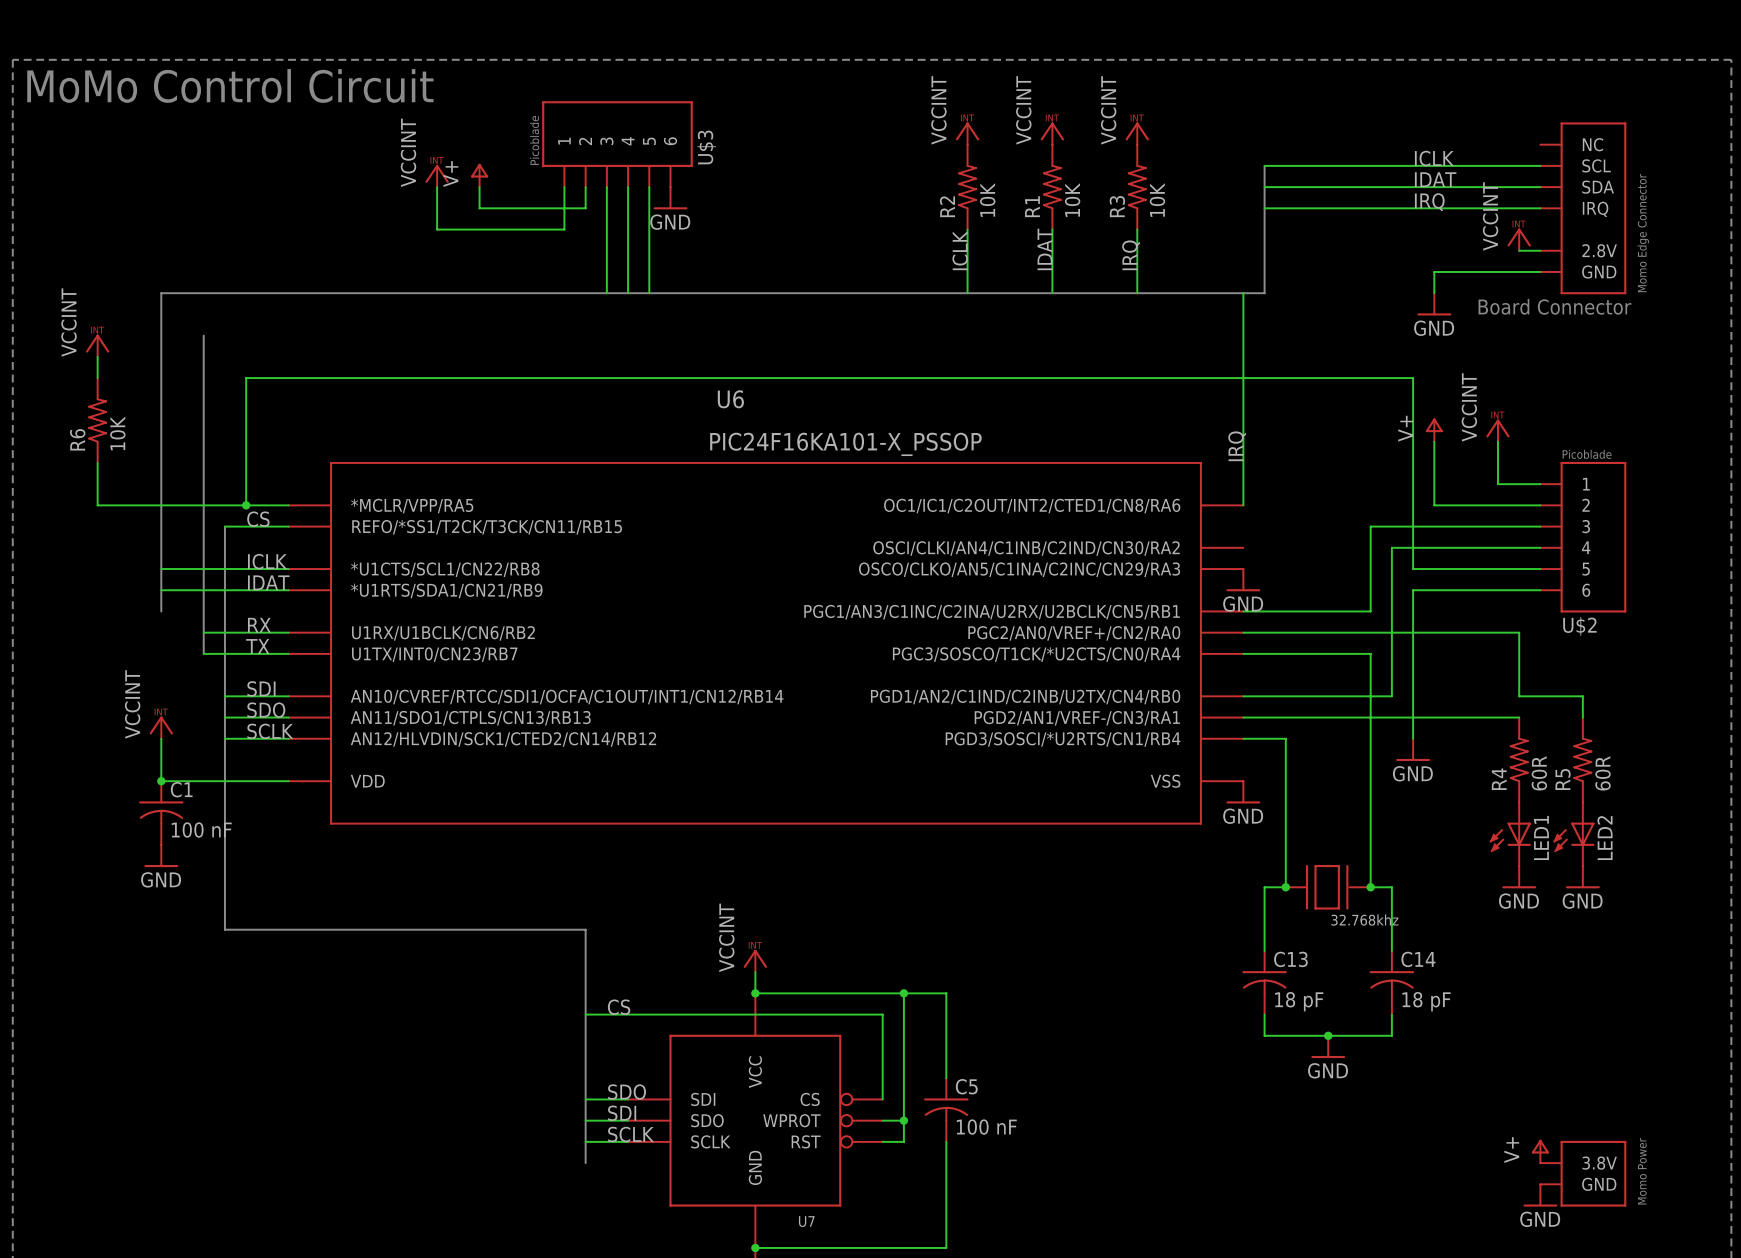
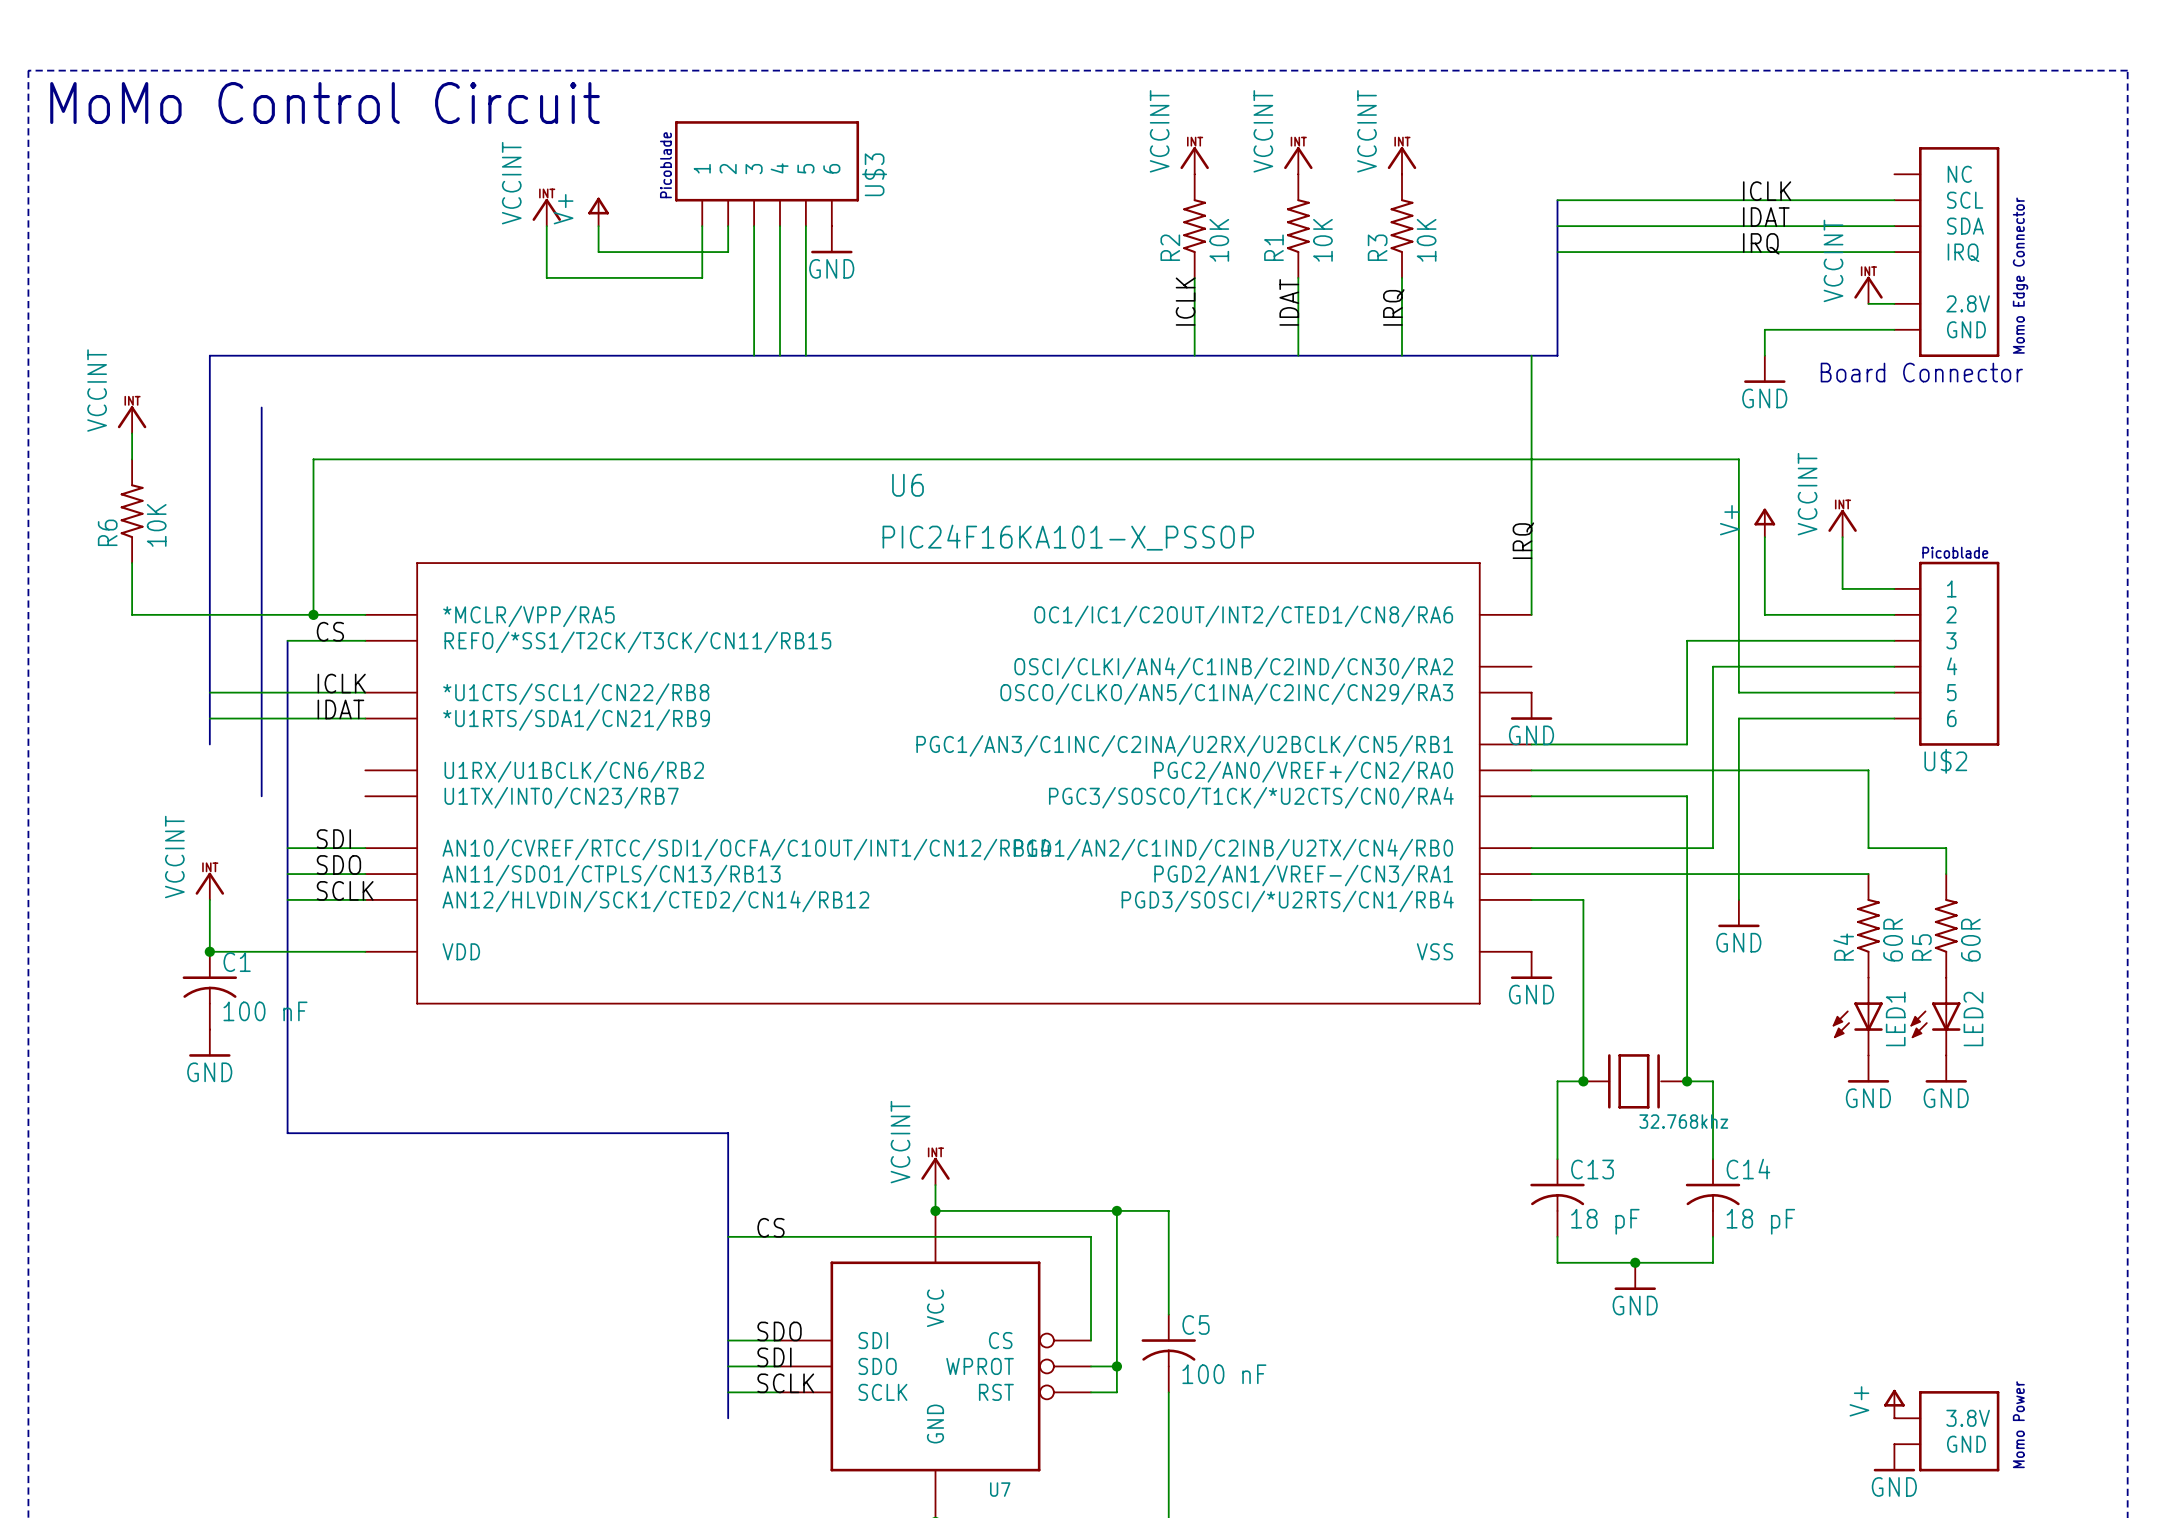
label: RX (259, 625) -> none
wire: (203, 632) (288, 632) -> none
label: TX (257, 646) -> none
wire: (203, 653) (288, 653) -> none

